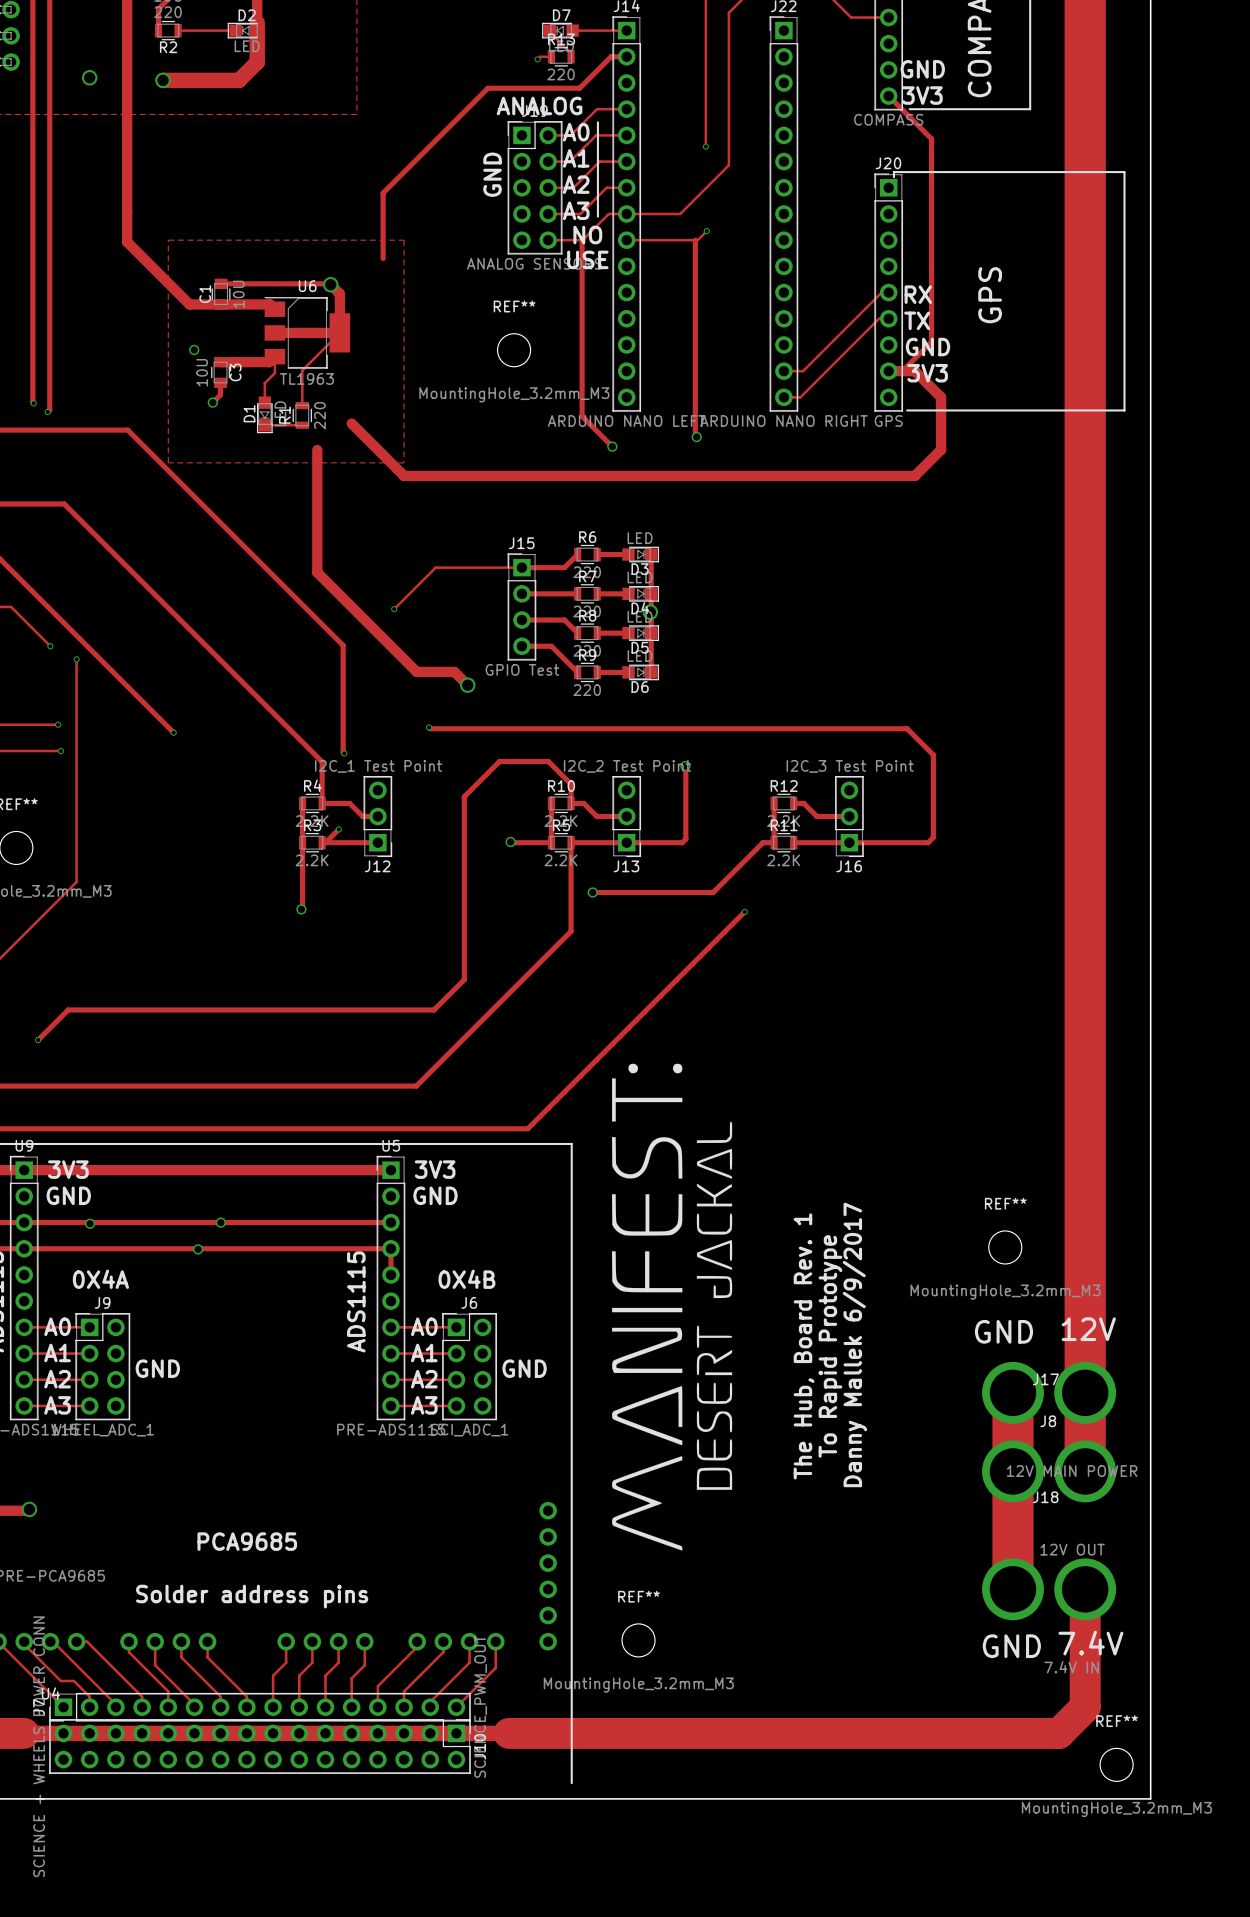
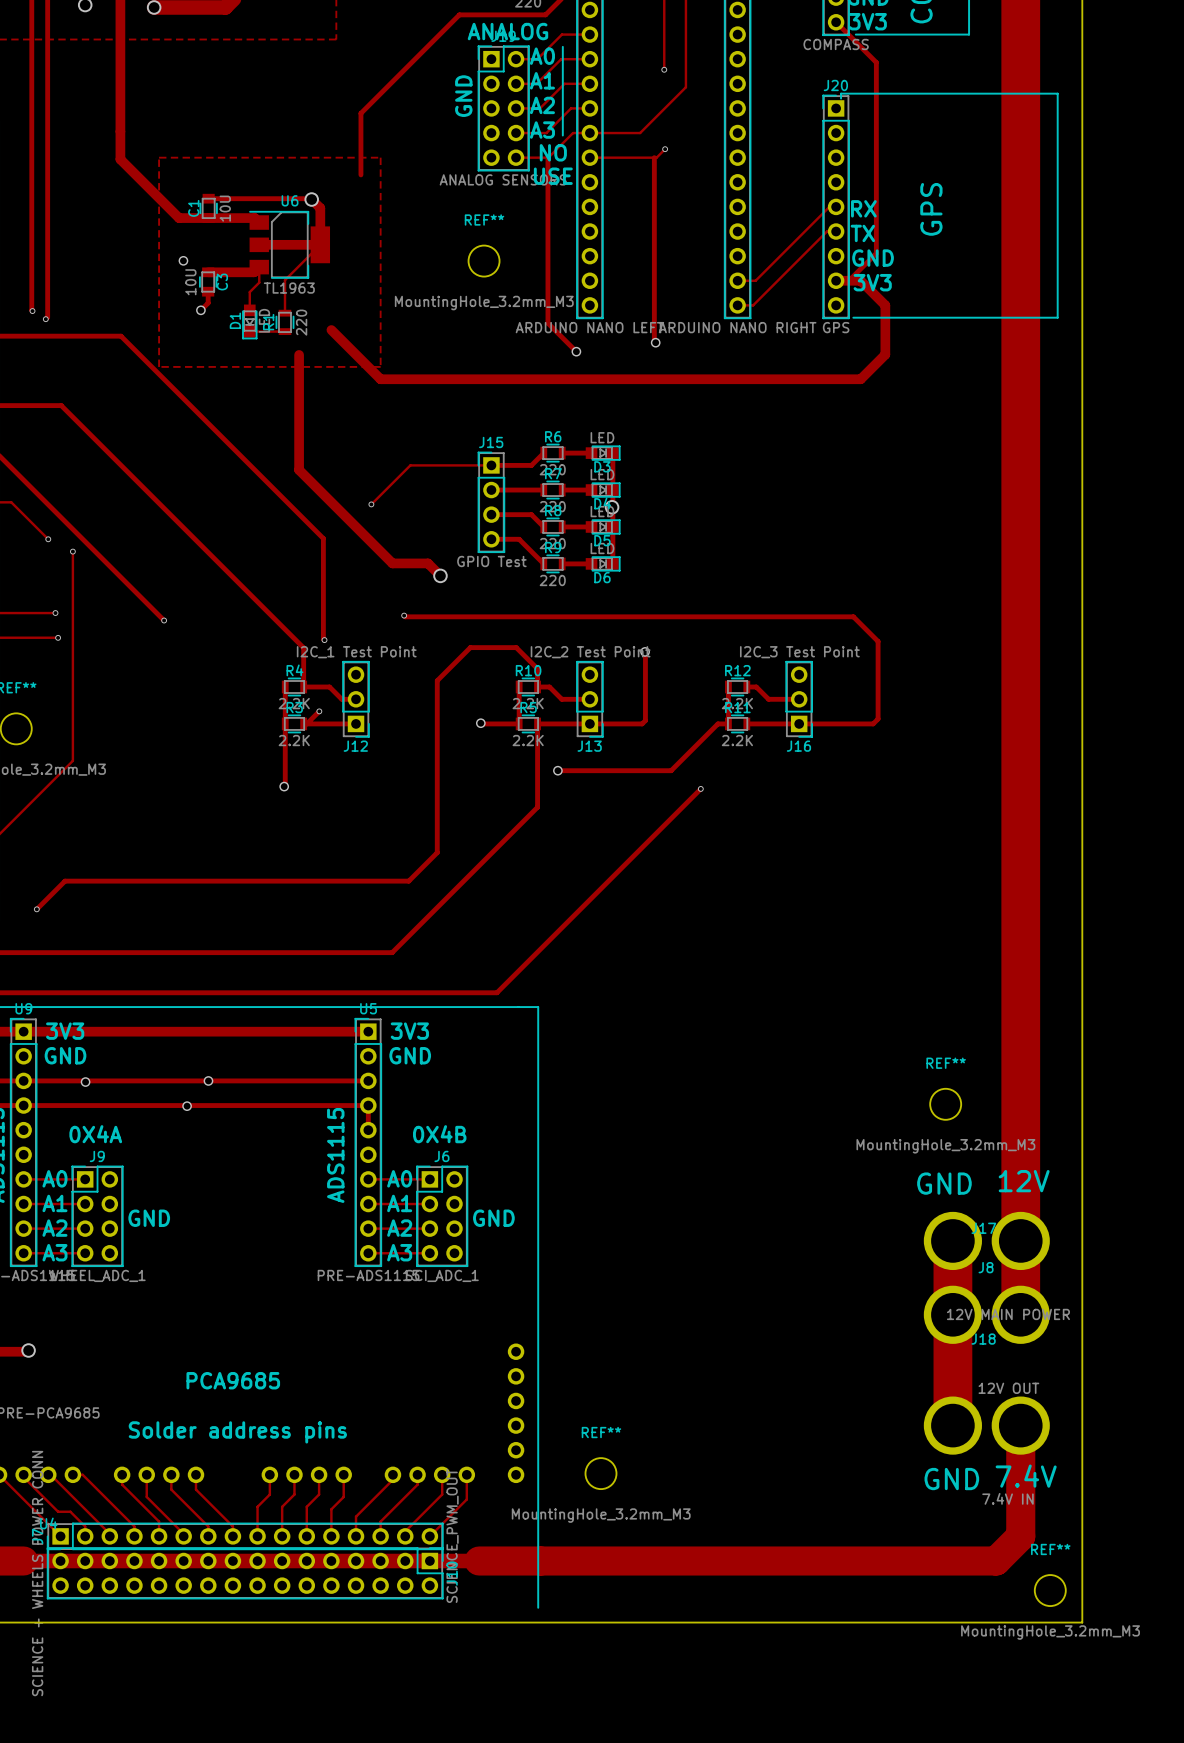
drawing: [611, 1063, 733, 1551] -> none
text: Danny Mallek 6/9/2017 (855, 1344) -> none
text: The Hub, Board Rev. 1 (804, 1346) -> none
text: To Rapid Prototype (830, 1346) -> none

